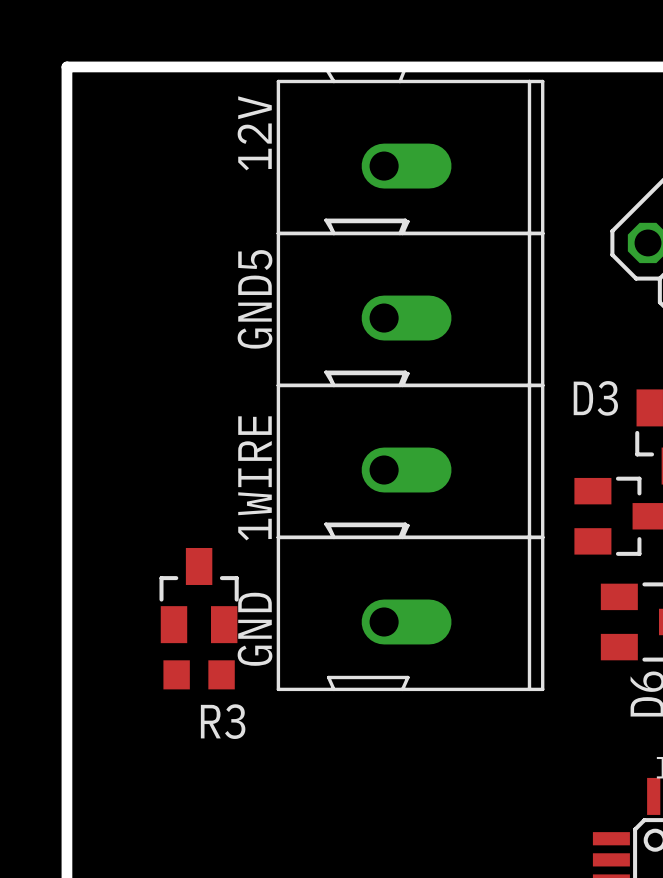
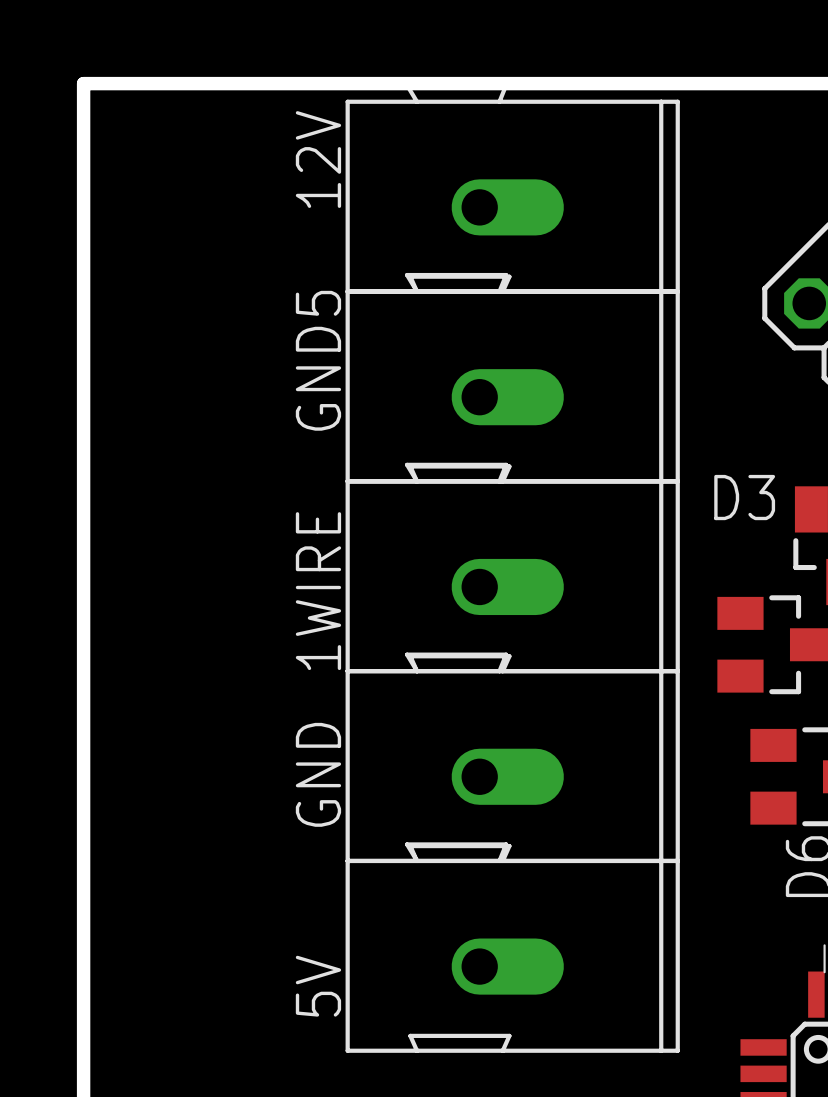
part: (199, 595) -> none
R3: (199, 674) -> none
5V: none -> (512, 947)

